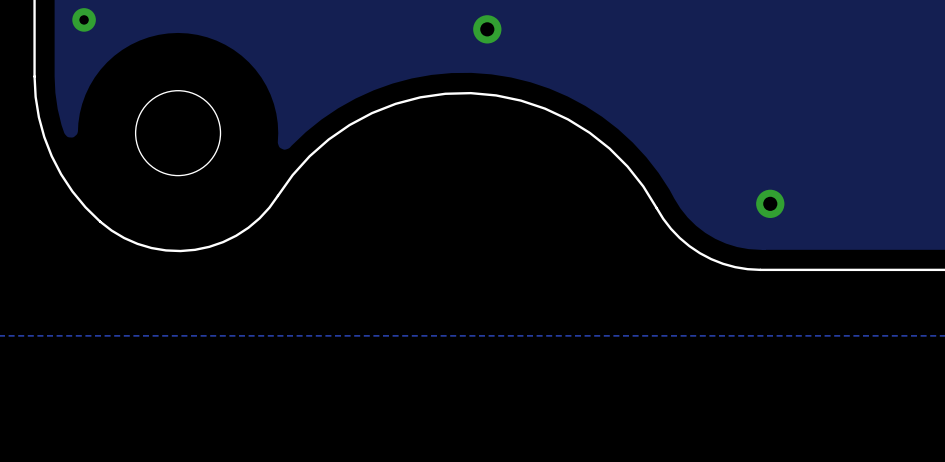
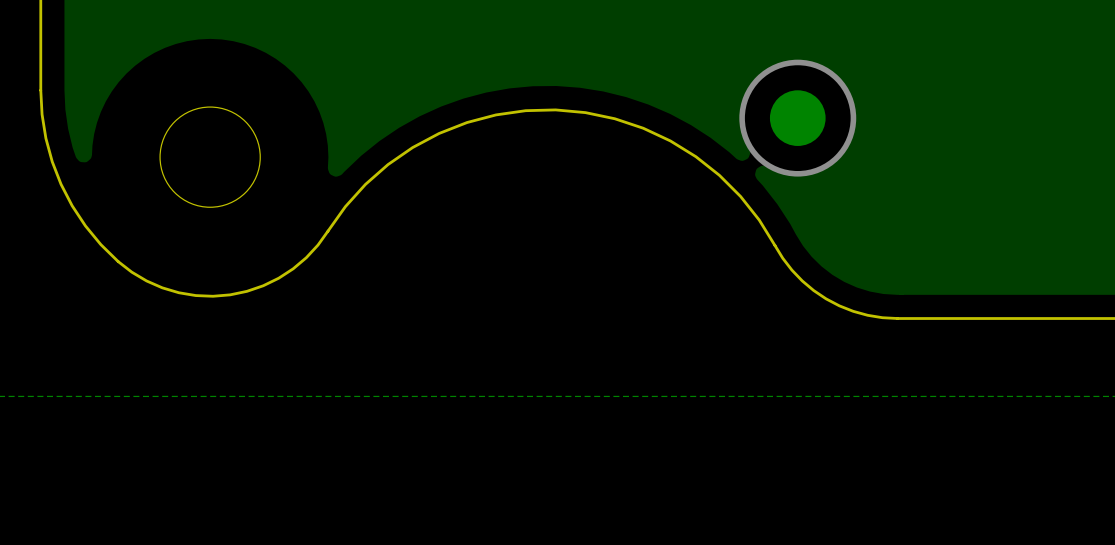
via: (84, 19) -> none
via: (487, 29) -> none
part: none -> (797, 118)
via: (770, 203) -> none

